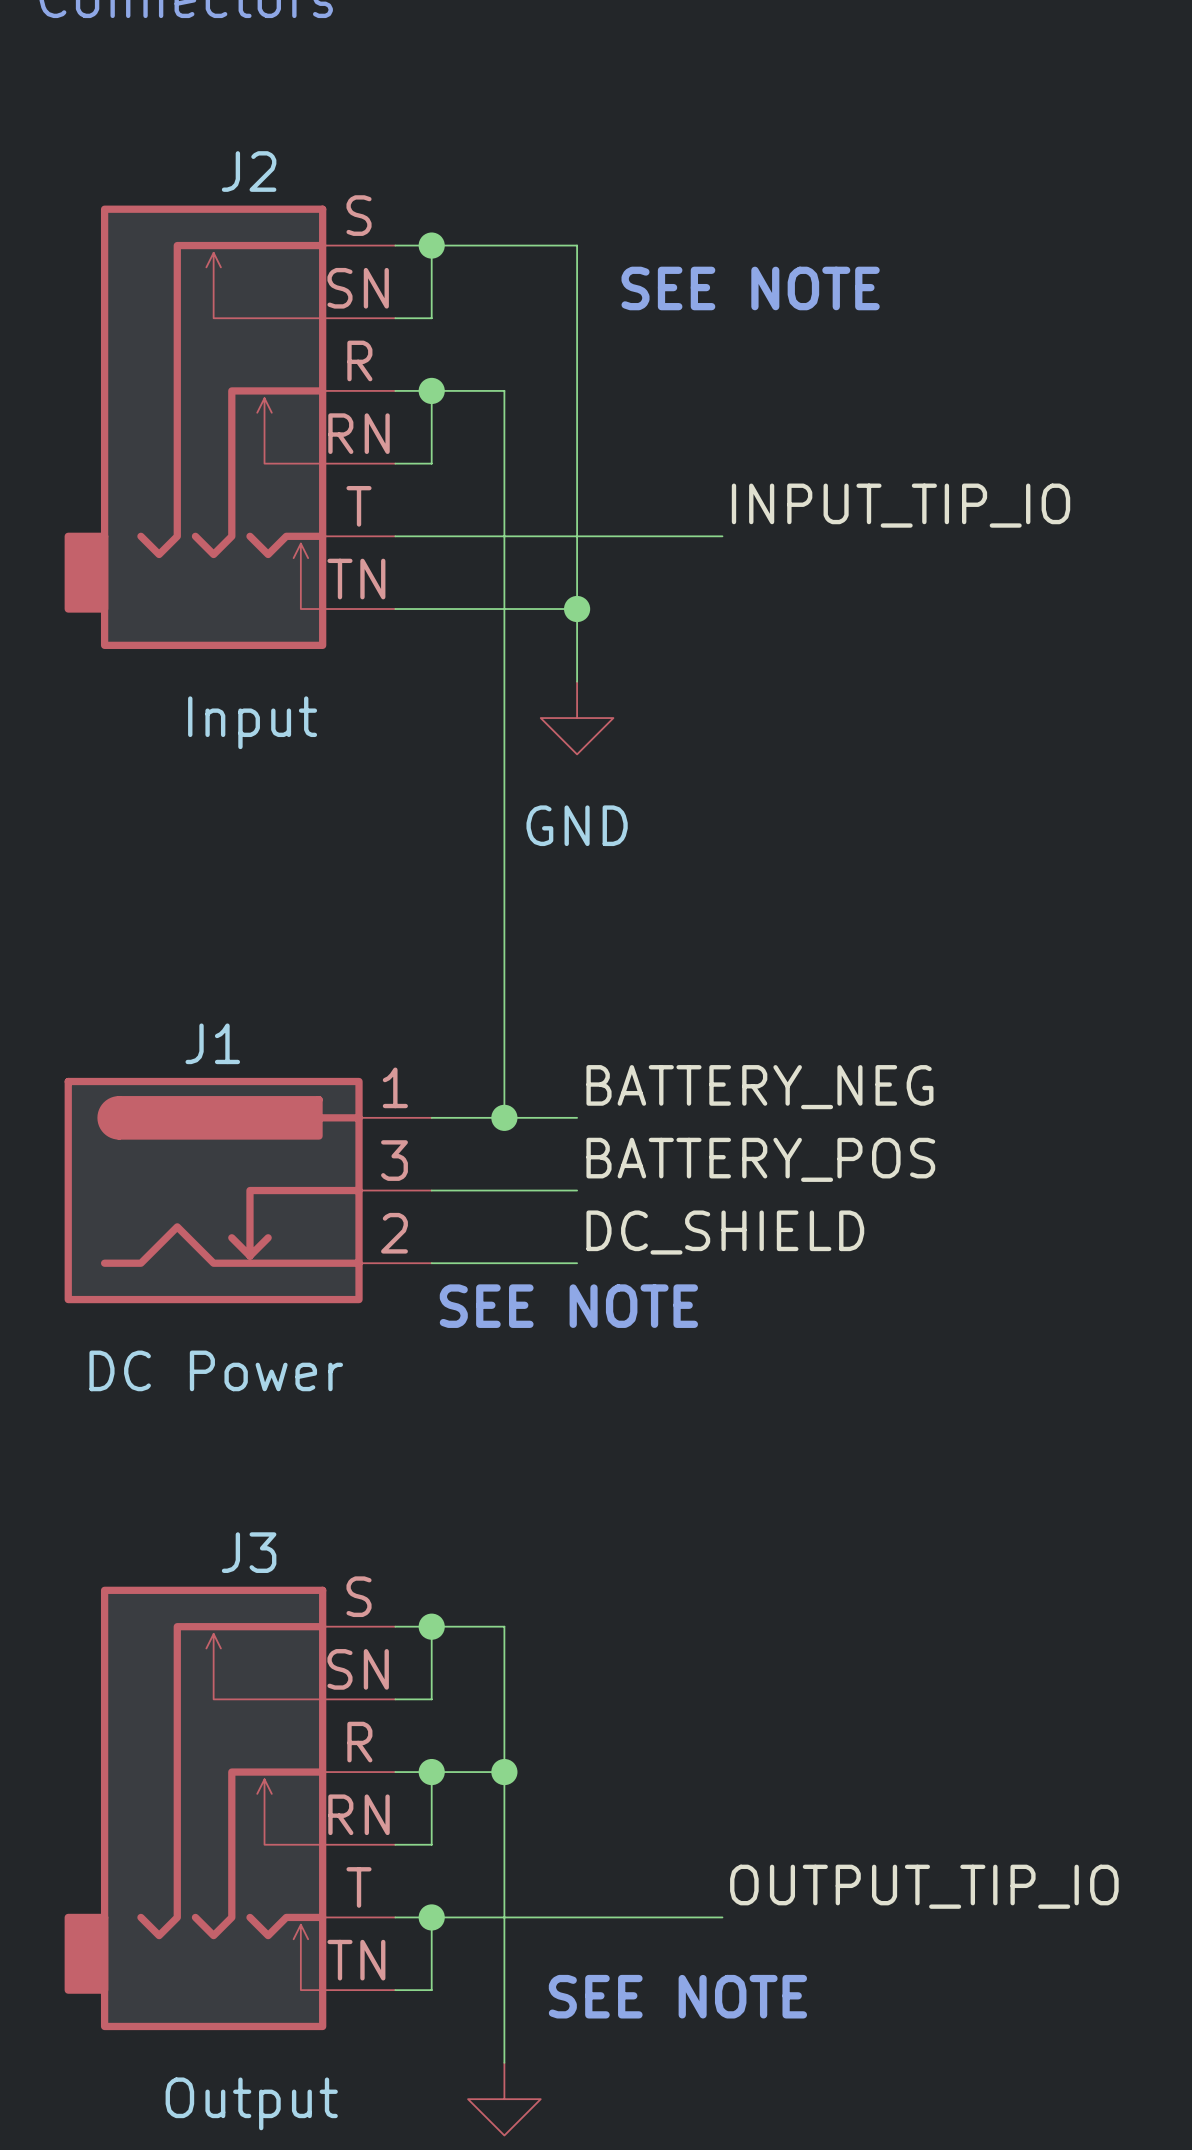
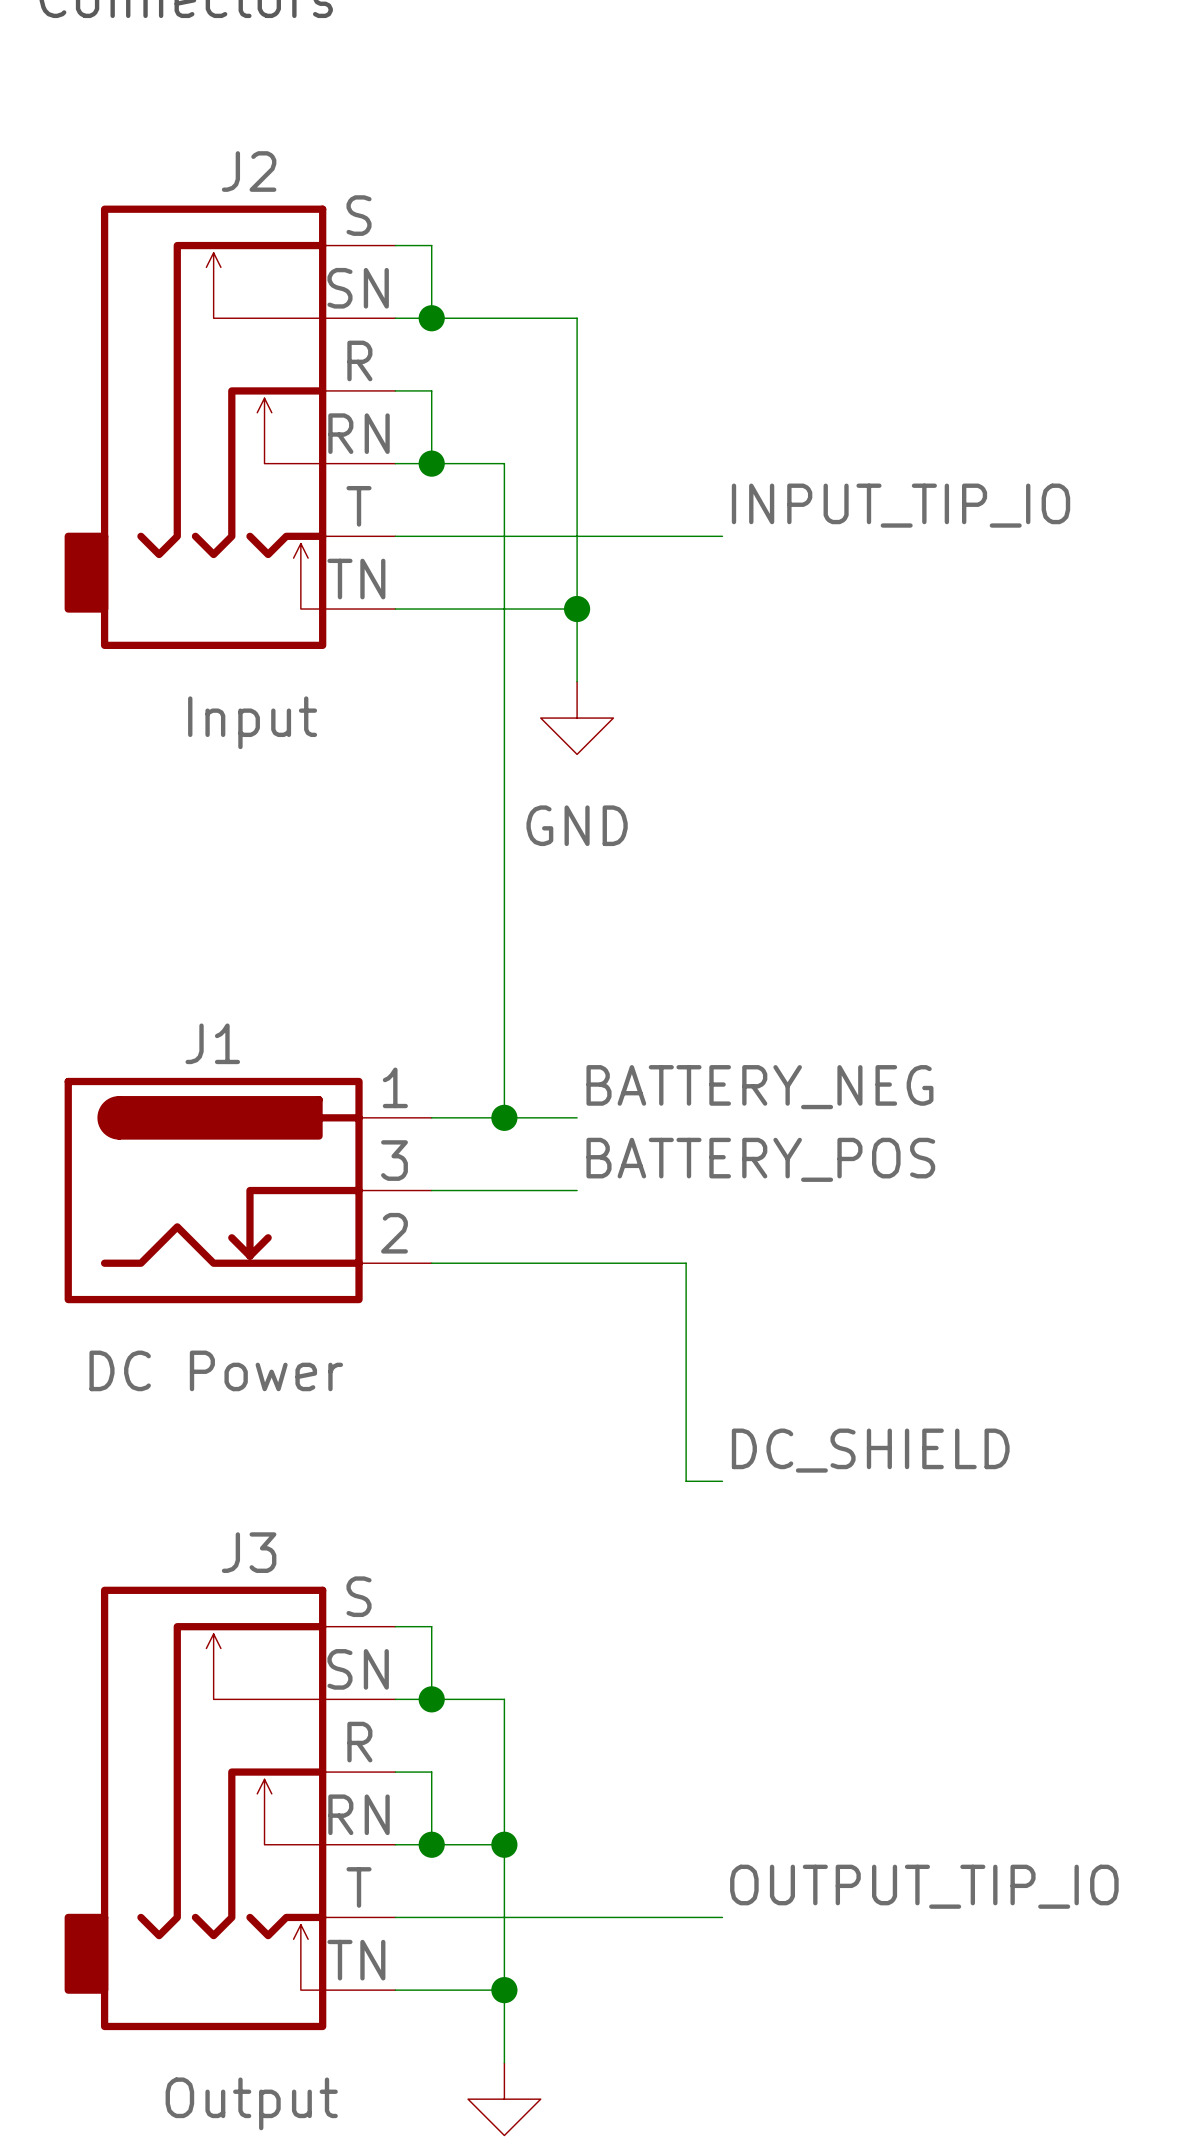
wire: (431, 245) (577, 245) (577, 318) -> (431, 318) (577, 318)
junction: (431, 245) -> none
text: SEE NOTE (750, 288) -> none
junction: none -> (431, 318)
wire: (431, 390) (504, 390) (504, 463) -> (431, 463) (504, 463)
junction: (431, 390) -> none
junction: none -> (431, 463)
label position: DC_SHIELD (725, 1232) -> DC_SHIELD (870, 1450)
wire: none -> (577, 1263) (686, 1263) (686, 1481) (722, 1481)
text: SEE NOTE (568, 1306) -> none
wire: (431, 1626) (504, 1626) (504, 1699) -> (431, 1699) (504, 1699)
junction: (431, 1626) -> none
junction: none -> (431, 1699)
wire: (431, 1772) (504, 1772) -> (431, 1844) (504, 1844)
junction: (431, 1772) -> none
junction: (504, 1772) -> none
junction: none -> (431, 1844)
junction: none -> (504, 1844)
wire: (431, 1917) (431, 1990) -> (504, 1990) (431, 1990)
junction: (431, 1917) -> none
junction: none -> (504, 1990)
text: SEE NOTE (677, 1996) -> none

